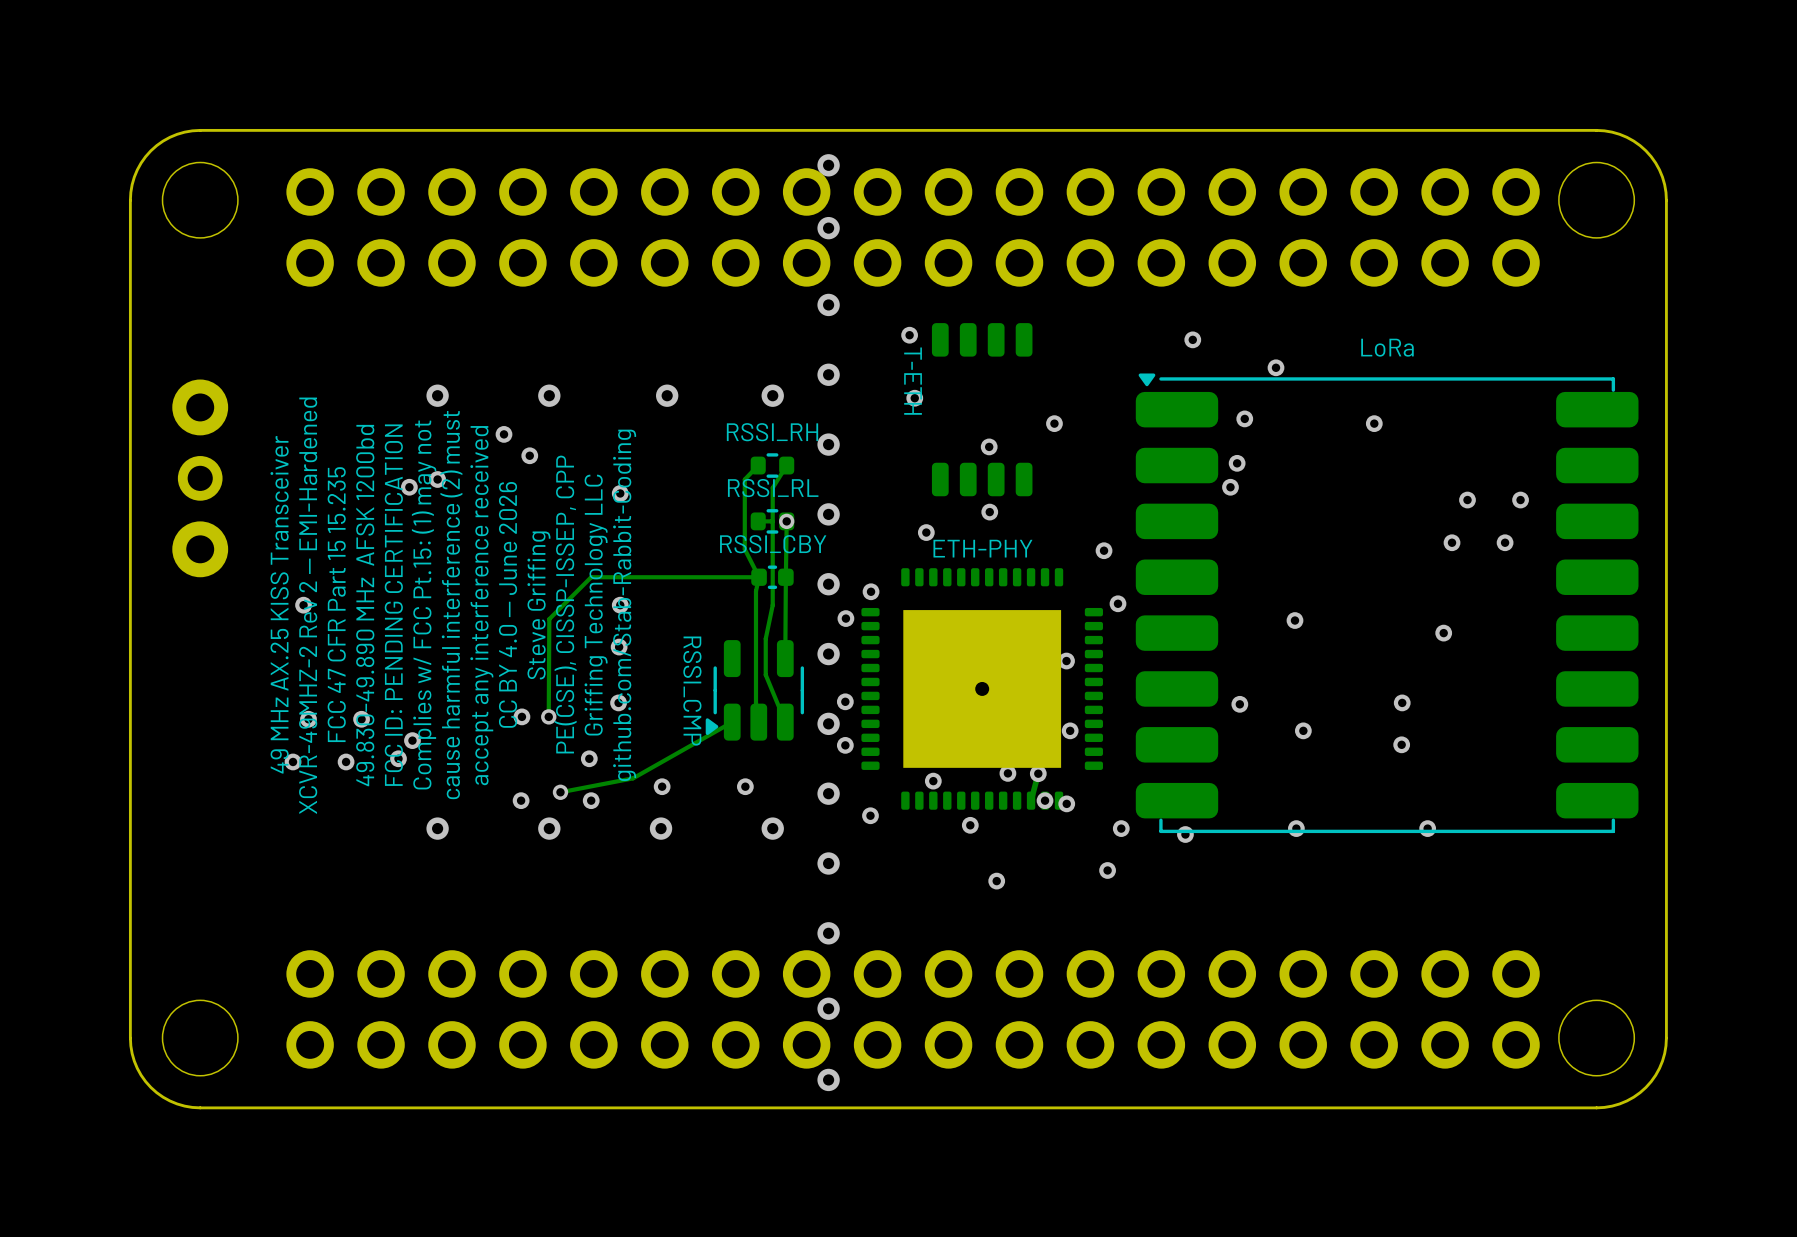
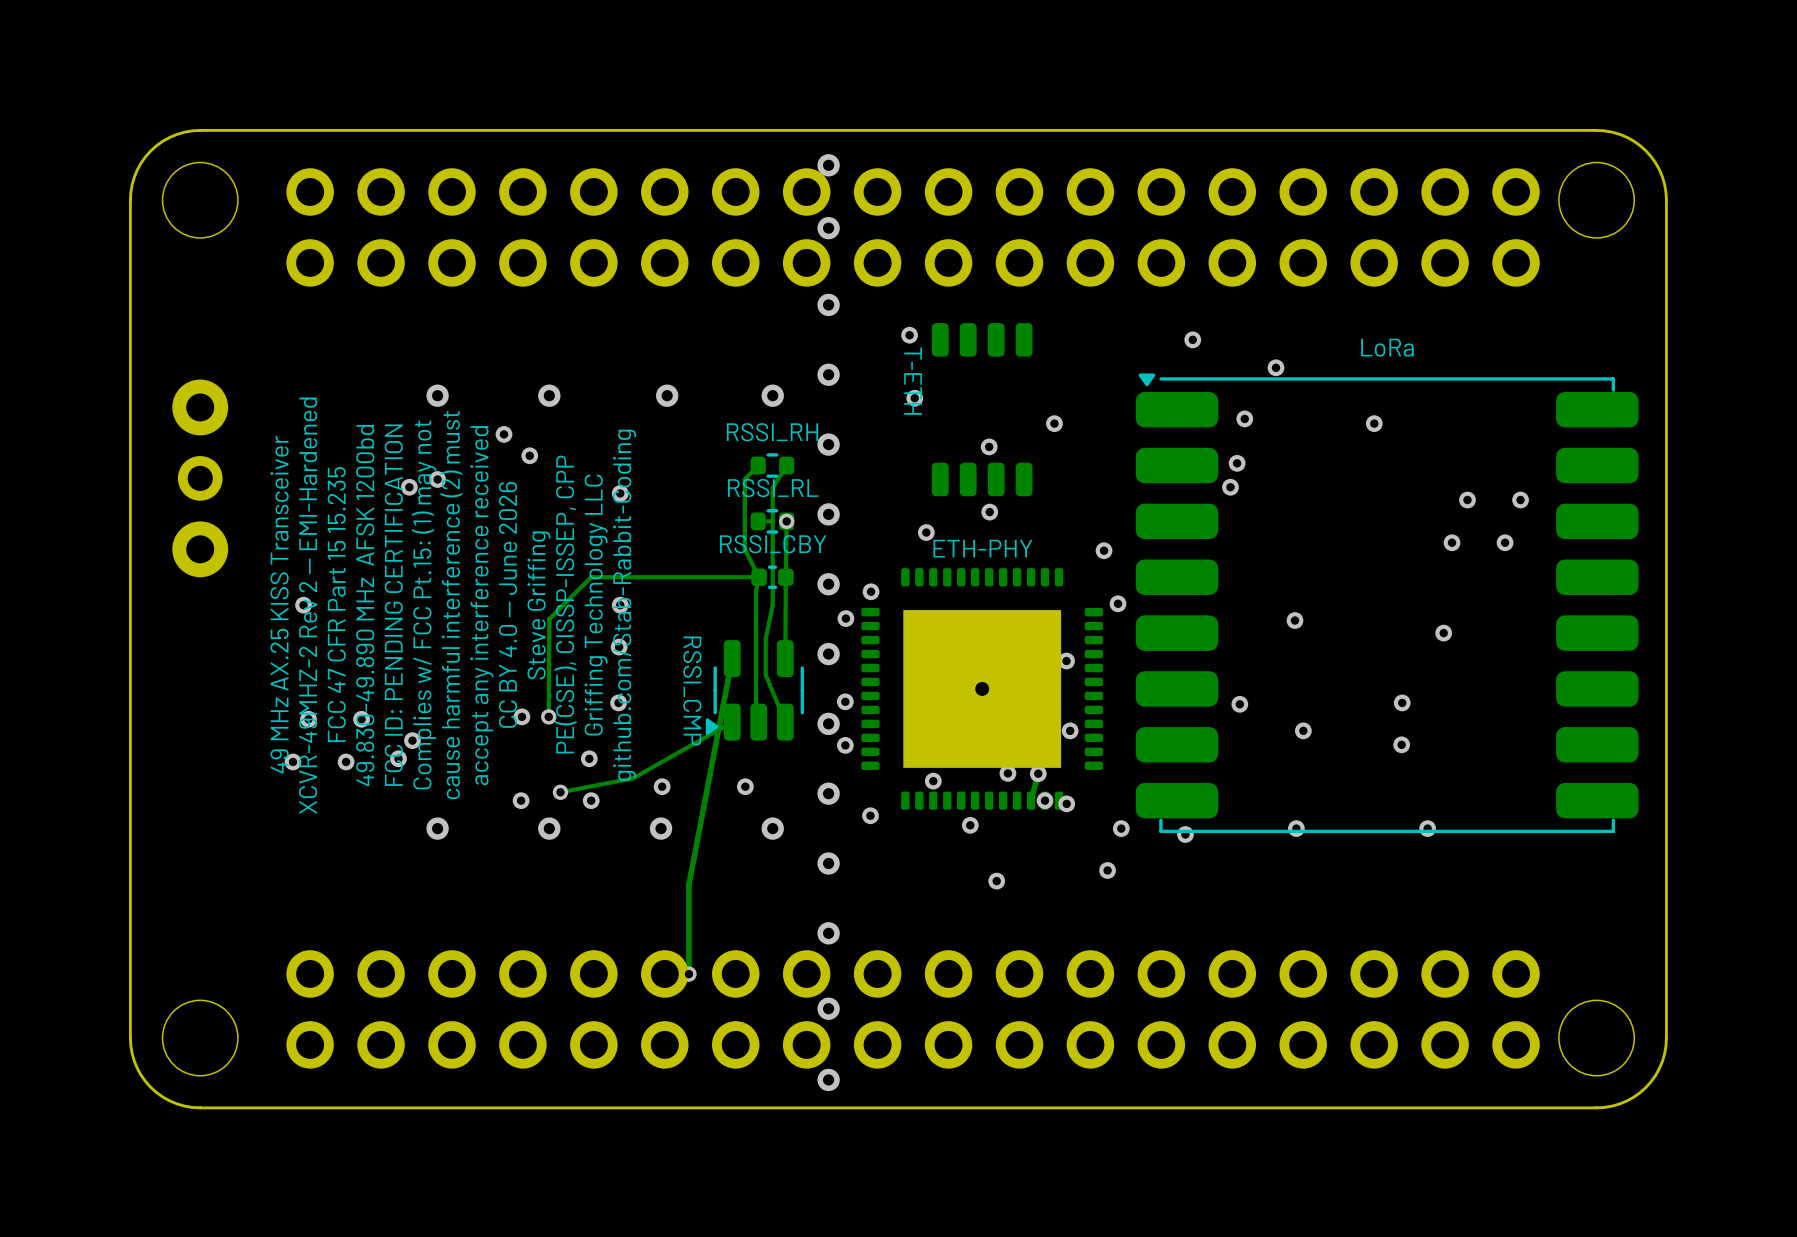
track: none -> (732, 658) (688, 884) (688, 974)
via: none -> (688, 974)

